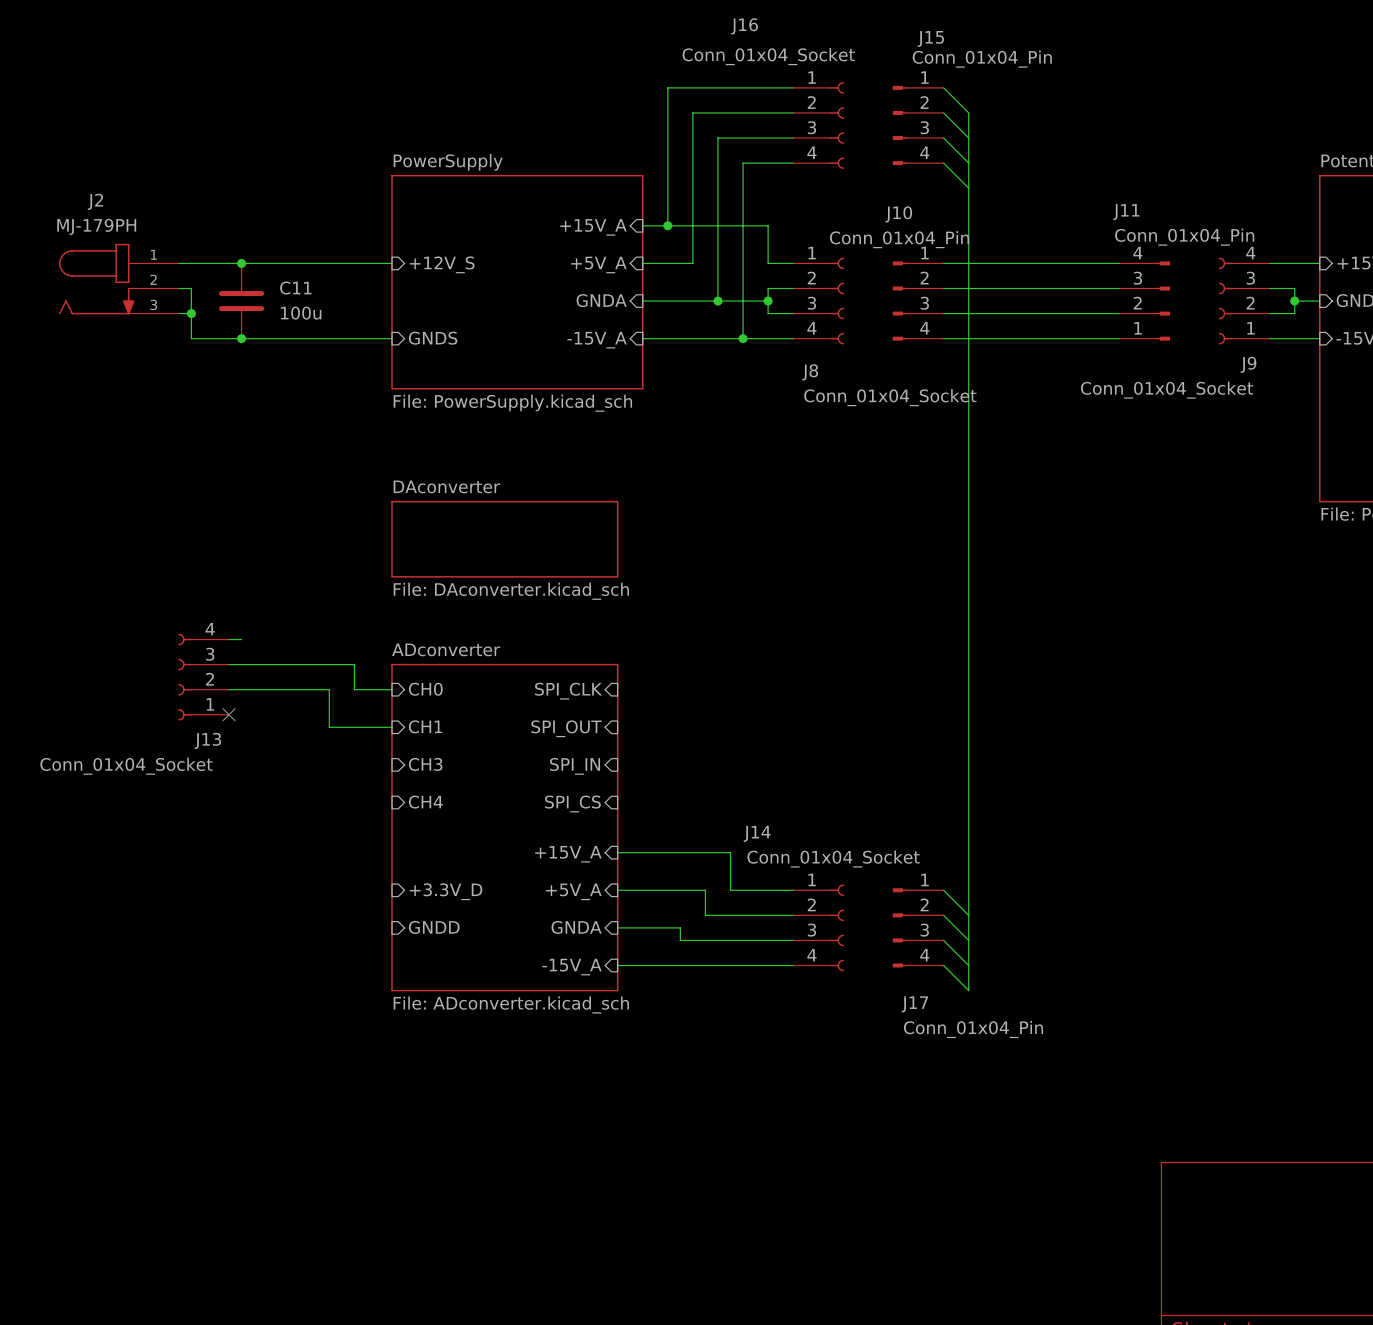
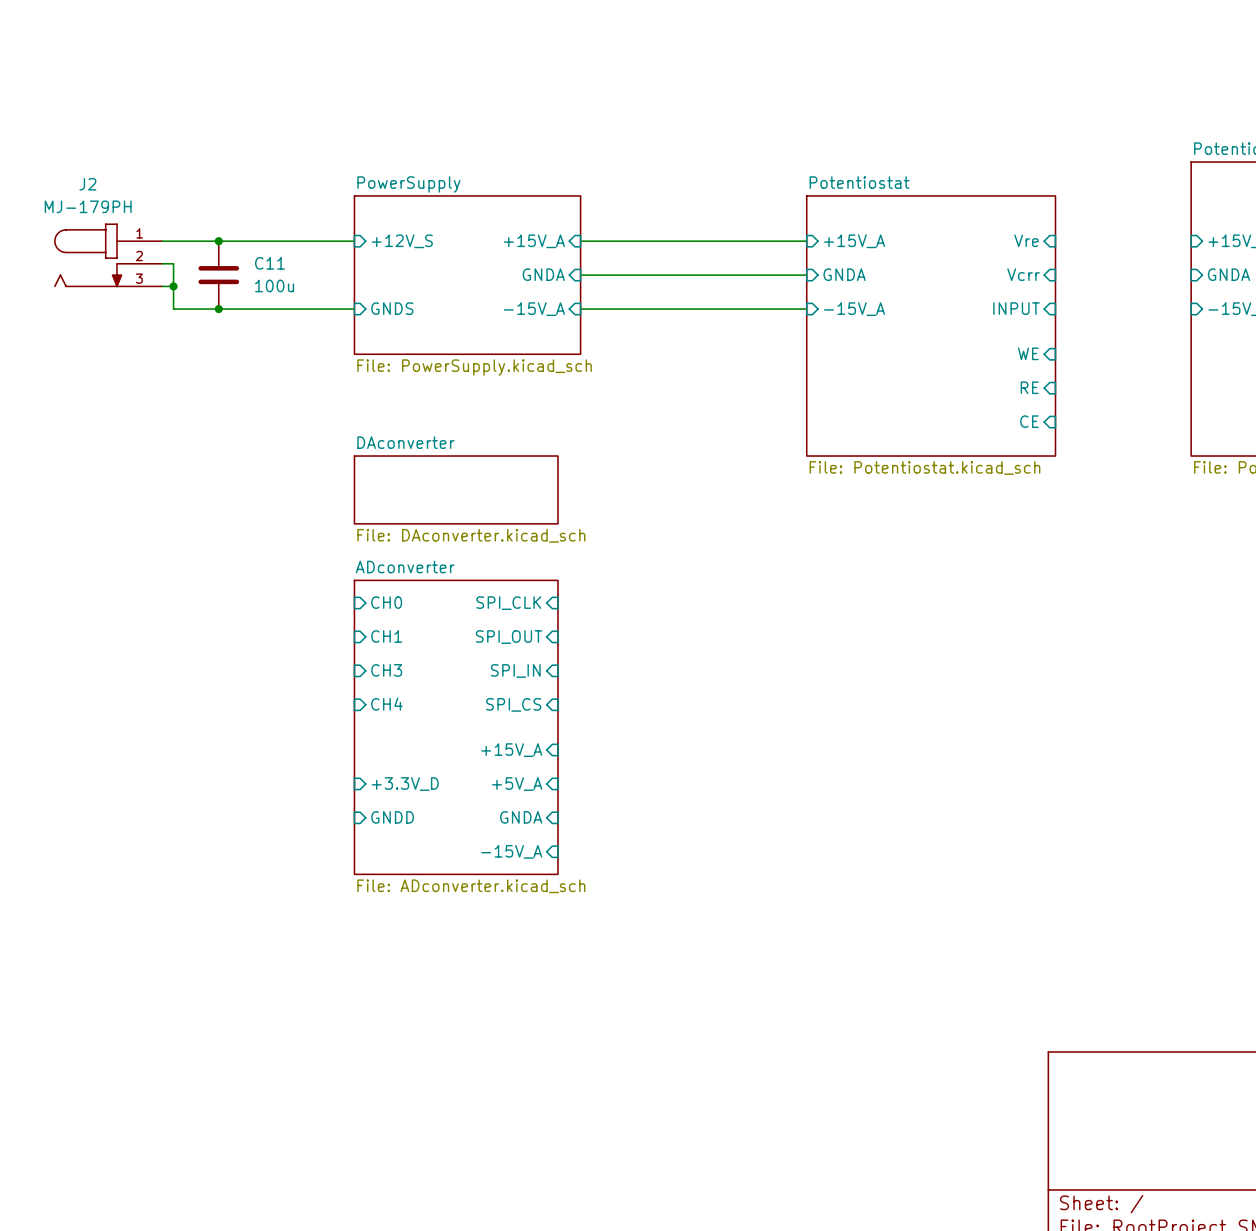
wire: (793, 87) (667, 87) (667, 225) -> none
wire: (943, 87) (968, 112) (968, 990) (943, 965) -> none
wire: (793, 112) (692, 112) (692, 263) -> none
wire: (943, 112) (968, 138) -> none
J15: Conn_01x04_Socket (818, 125) -> none
J16: Conn_01x04_Pin (918, 125) -> none
wire: (793, 138) (717, 138) (717, 301) -> none
wire: (943, 138) (968, 163) -> none
wire: (793, 163) (743, 163) (743, 338) -> none
wire: (943, 163) (968, 188) -> none
wire: (642, 225) (768, 225) (768, 263) -> (625, 241) (693, 241)
junction: (667, 225) -> none
sheet pin: +15V_A (593, 227) -> none
wire: none -> (716, 241) (806, 241)
wire: (943, 263) (1119, 263) -> none
sheet pin: none -> Vre (1026, 240)
wire: (1269, 263) (1319, 263) -> none
sheet pin: +5V_A (598, 264) -> +15V_A (534, 241)
sheet pin: none -> +15V_A (854, 241)
sheet PowerSupply: File: PowerSupply.kicad_sch (517, 282) -> none
wire: (793, 288) (768, 288) (768, 313) (793, 313) -> none
wire: (943, 288) (1119, 288) -> none
wire: (1269, 288) (1294, 288) (1294, 313) (1269, 313) -> none
sheet pin: none -> GNDA (844, 274)
sheet pin: none -> Vcrr (1023, 274)
sheet PowerSupply: none -> File: PowerSupply.kicad_sch (467, 275)
junction: (717, 301) -> none
wire: none -> (693, 275) (806, 275)
junction: (768, 301) -> none
J8: Conn_01x04_Socket (818, 301) -> none
J10: Conn_01x04_Pin (918, 301) -> none
J11: Conn_01x04_Pin (1144, 301) -> none
J9: Conn_01x04_Socket (1244, 301) -> none
wire: (1294, 301) (1319, 301) -> none
junction: (1294, 301) -> none
wire: (943, 313) (1119, 313) -> none
junction: (743, 338) -> none
wire: none -> (716, 309) (806, 309)
wire: (943, 338) (1119, 338) -> none
sheet pin: none -> INPUT (1016, 308)
wire: (1269, 338) (1319, 338) -> none
sheet pin: none -> -15V_A (854, 309)
sheet Potentiostat: none -> File: Potentiostat.kicad_sch (931, 325)
sheet pin: none -> WE (1028, 353)
sheet pin: none -> RE (1029, 387)
sheet pin: none -> CE (1029, 421)
wire: (229, 639) (241, 639) -> none
wire: (229, 664) (354, 664) (354, 689) (392, 689) -> none
J13: Conn_01x04_Socket (203, 677) -> none
wire: (229, 689) (329, 689) (329, 727) (392, 727) -> none
sheet pin position: CH0 (425, 689) -> CH0 (386, 602)
sheet pin position: SPI_CLK (568, 691) -> SPI_CLK (508, 603)
no-connect mark: (229, 714) -> none
sheet pin position: CH1 (425, 726) -> CH1 (386, 636)
sheet pin position: SPI_OUT (566, 728) -> SPI_OUT (509, 637)
sheet pin position: CH3 (425, 764) -> CH3 (386, 670)
sheet pin position: SPI_IN (575, 766) -> SPI_IN (515, 670)
sheet pin position: CH4 (425, 802) -> CH4 (386, 704)
sheet pin position: SPI_CS (572, 803) -> SPI_CS (513, 704)
sheet ADconverter position: (504, 827) -> (456, 727)
wire: (617, 852) (730, 852) (730, 890) (793, 890) -> none
sheet pin position: +15V_A (568, 854) -> +15V_A (511, 750)
wire: (617, 890) (705, 890) (705, 915) (793, 915) -> none
wire: (943, 890) (968, 915) -> none
sheet pin position: +3.3V_D (446, 891) -> +3.3V_D (405, 784)
sheet pin position: +5V_A (573, 891) -> +5V_A (517, 784)
wire: (943, 915) (968, 940) -> none
sheet pin position: GNDD (434, 927) -> GNDD (392, 817)
sheet pin position: GNDA (576, 927) -> GNDA (521, 817)
wire: (617, 927) (680, 927) (680, 940) (793, 940) -> none
J14: Conn_01x04_Socket (818, 927) -> none
J17: Conn_01x04_Pin (918, 927) -> none
wire: (943, 940) (968, 965) -> none
wire: (617, 965) (793, 965) -> none
sheet pin position: -15V_A (571, 967) -> -15V_A (511, 851)

